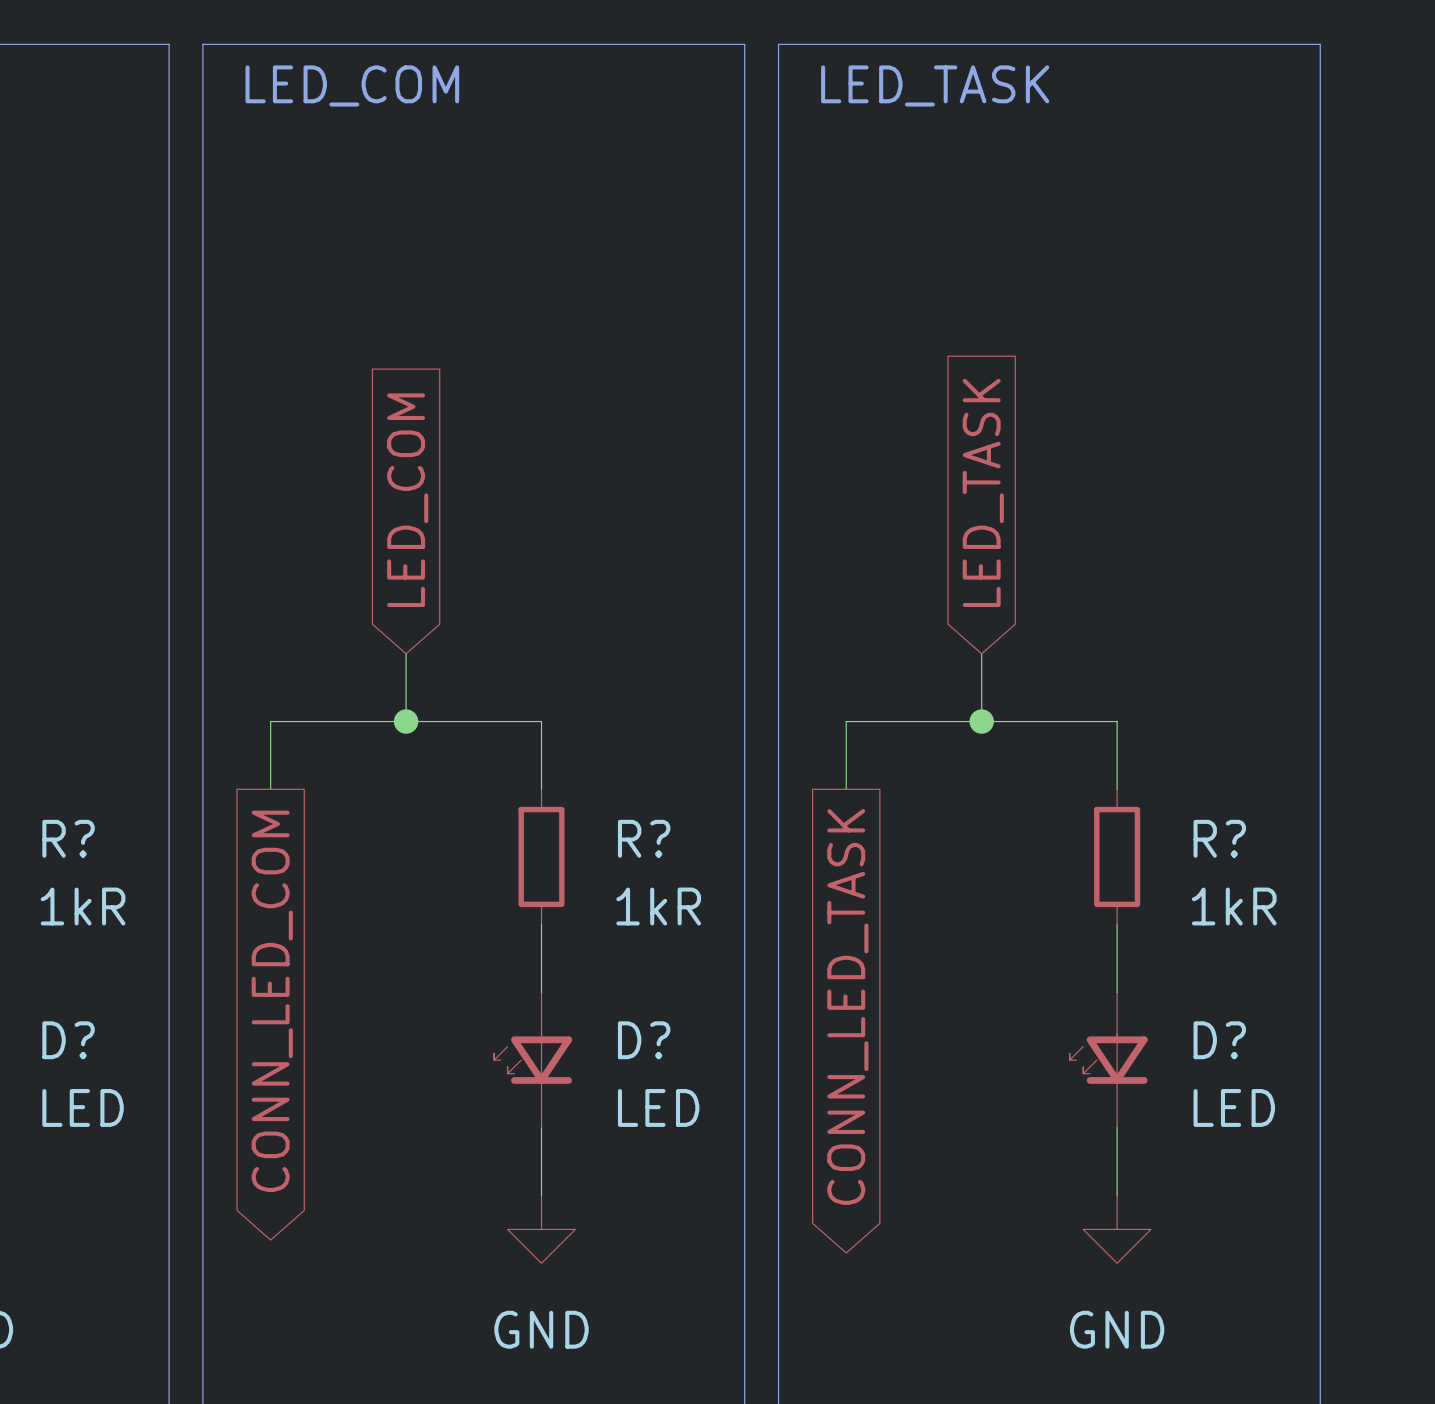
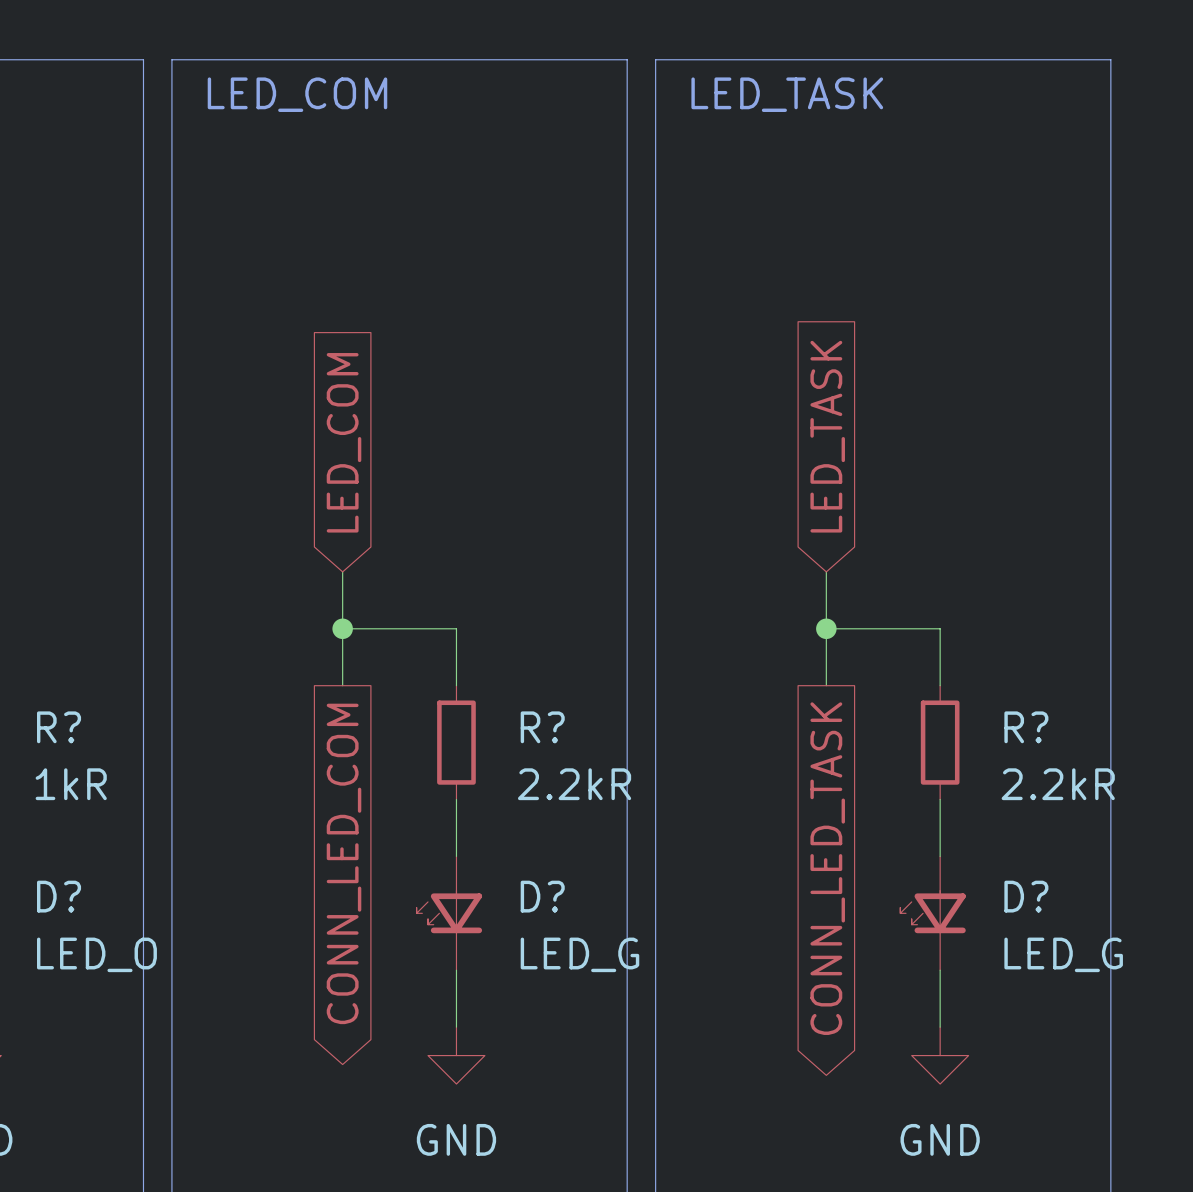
wire: (406, 721) (270, 721) (270, 789) -> (342, 628) (342, 685)
wire: (981, 721) (846, 721) (846, 789) -> (826, 628) (826, 685)
R? value: 1kR (658, 906) -> 2.2kR (574, 784)
R? value: 1kR (1234, 906) -> 2.2kR (1058, 784)
global label position: CONN_LED_COM (272, 1001) -> CONN_LED_COM (344, 863)
global label position: CONN_LED_TASK (847, 1006) -> CONN_LED_TASK (827, 868)
D? value: LED (83, 1107) -> LED_O (96, 954)
D? value: LED (658, 1107) -> LED_G (579, 954)
D? value: LED (1234, 1107) -> LED_G (1063, 954)

